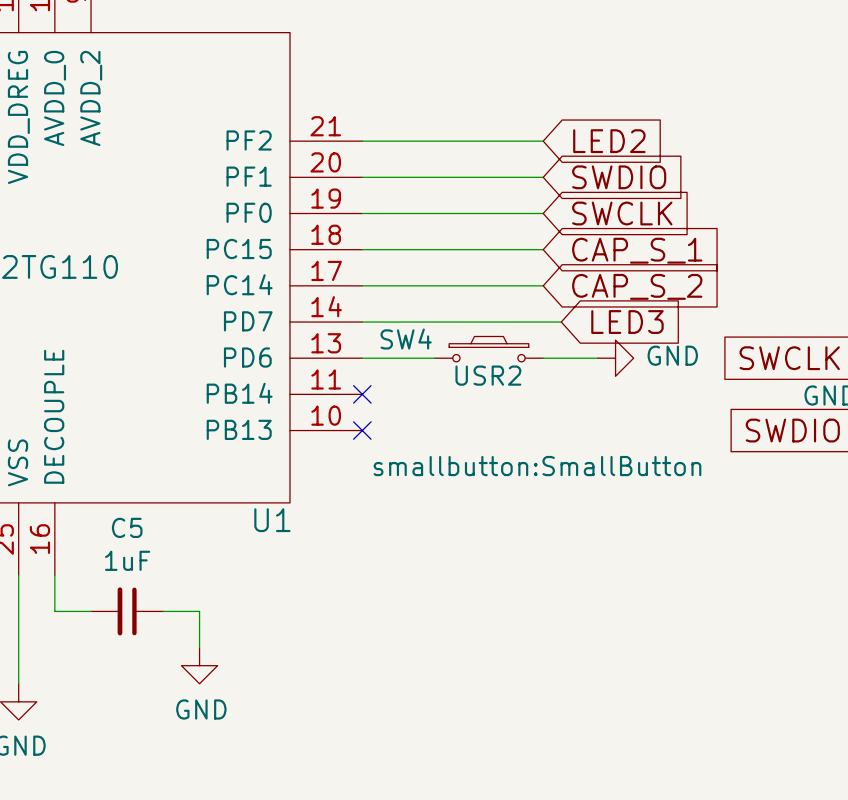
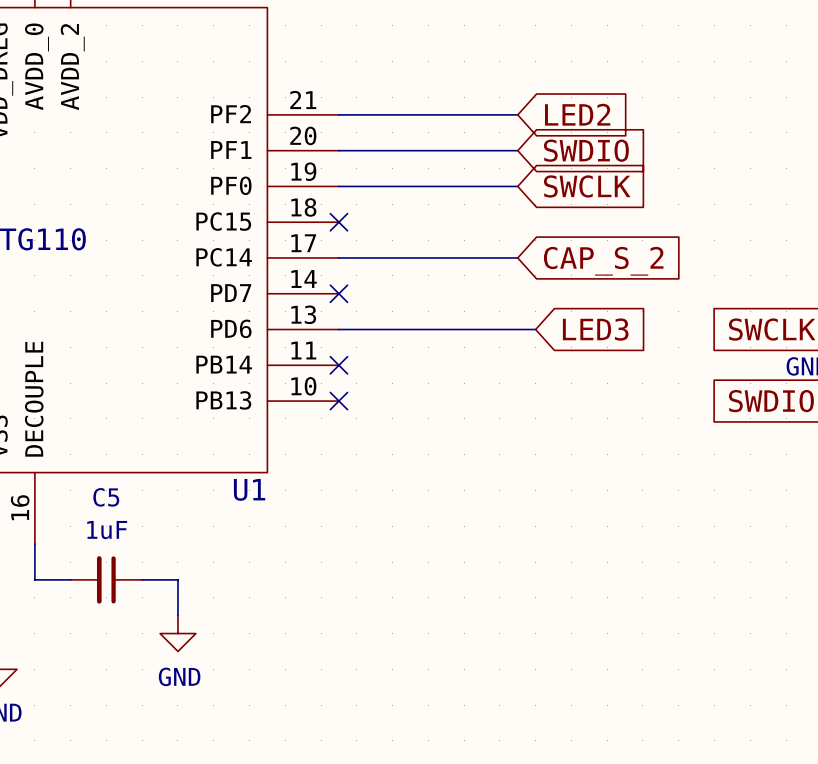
wire: (362, 249) (543, 249) -> none
no-connect mark: none -> (338, 222)
global label: CAP_S_1 (637, 250) -> none
wire: (362, 322) (561, 322) -> none
no-connect mark: none -> (338, 293)
global label position: LED3 (627, 322) -> LED3 (595, 329)
SW4: USR2 (488, 349) -> none
wire: none -> (410, 329) (517, 329)
wire: (561, 358) (597, 358) -> none
power symbol: GND (615, 358) -> none

